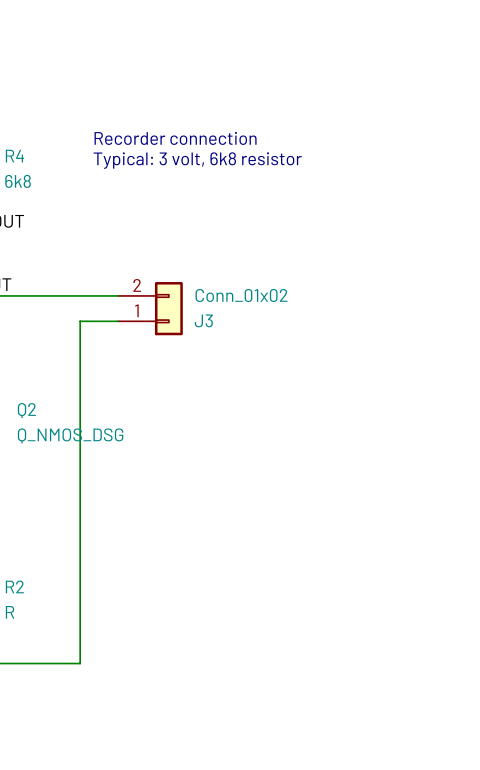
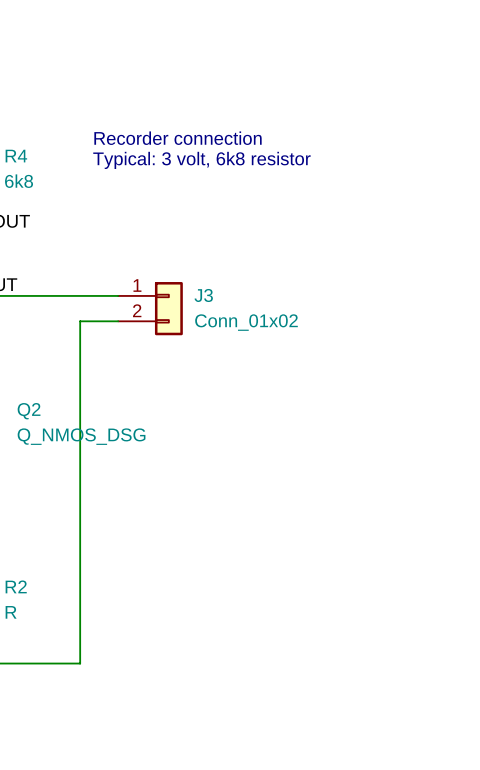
J3 flip: as is (168, 308) -> up-down (168, 308)

